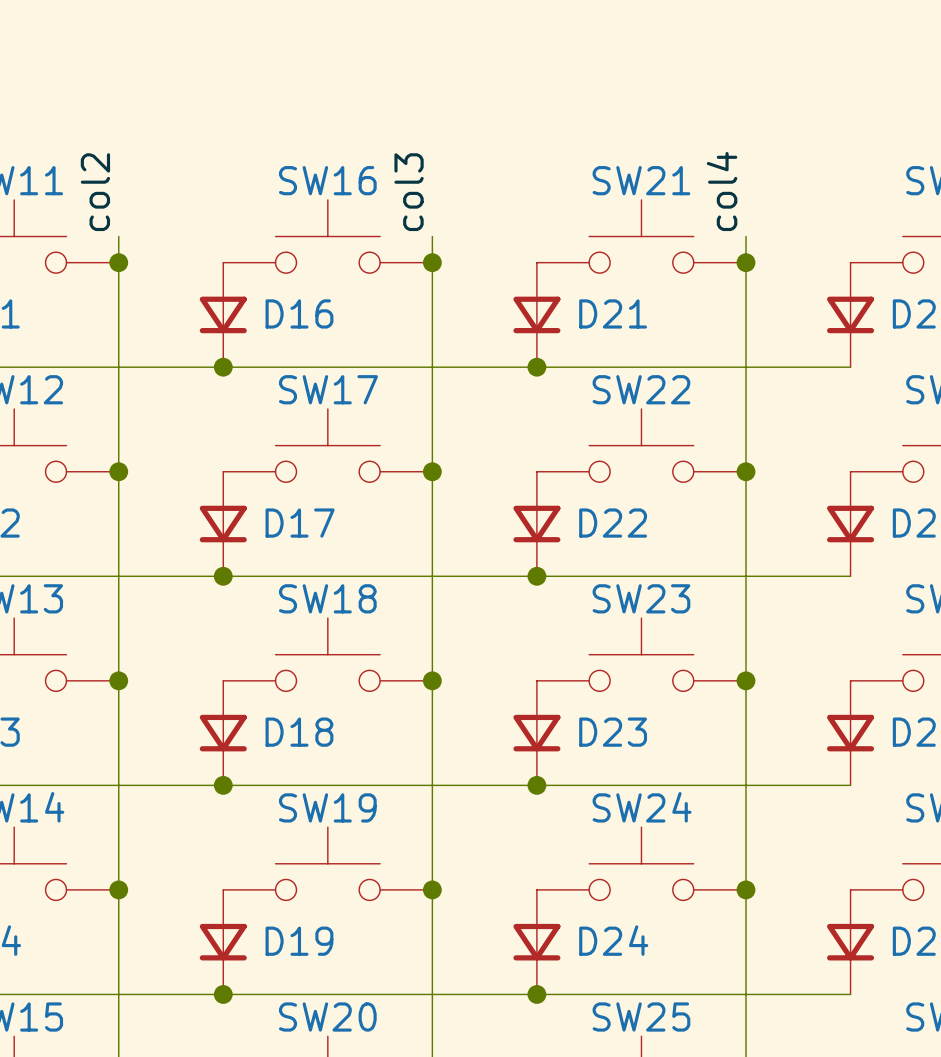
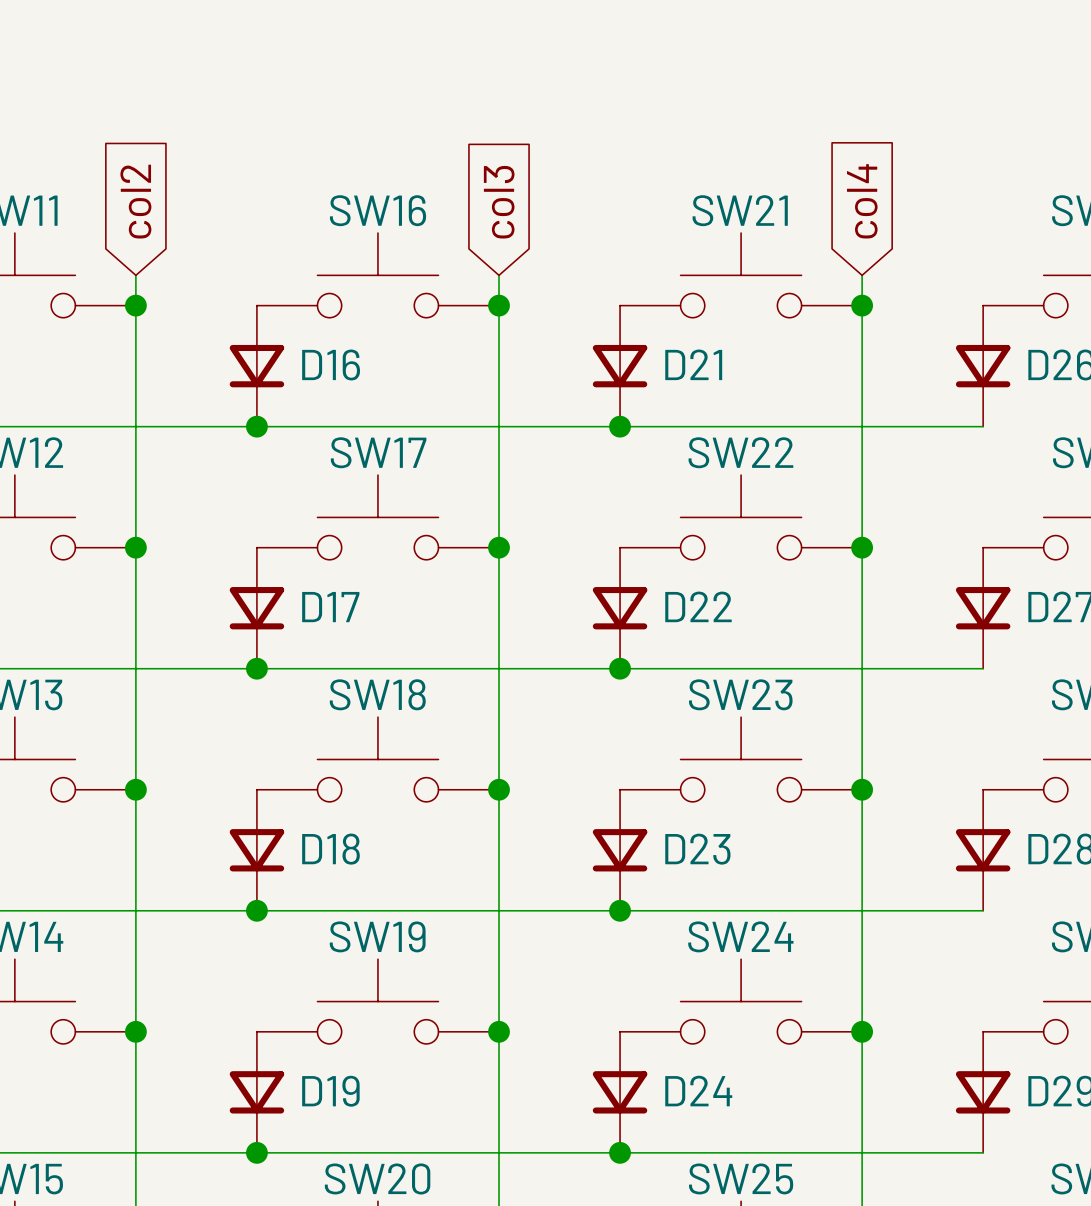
global label: none -> col2 (135, 201)
global label: none -> col3 (499, 202)
global label: none -> col4 (862, 201)
label: col4 (722, 191) -> none
label: col2 (95, 192) -> none
label: col3 (409, 192) -> none

